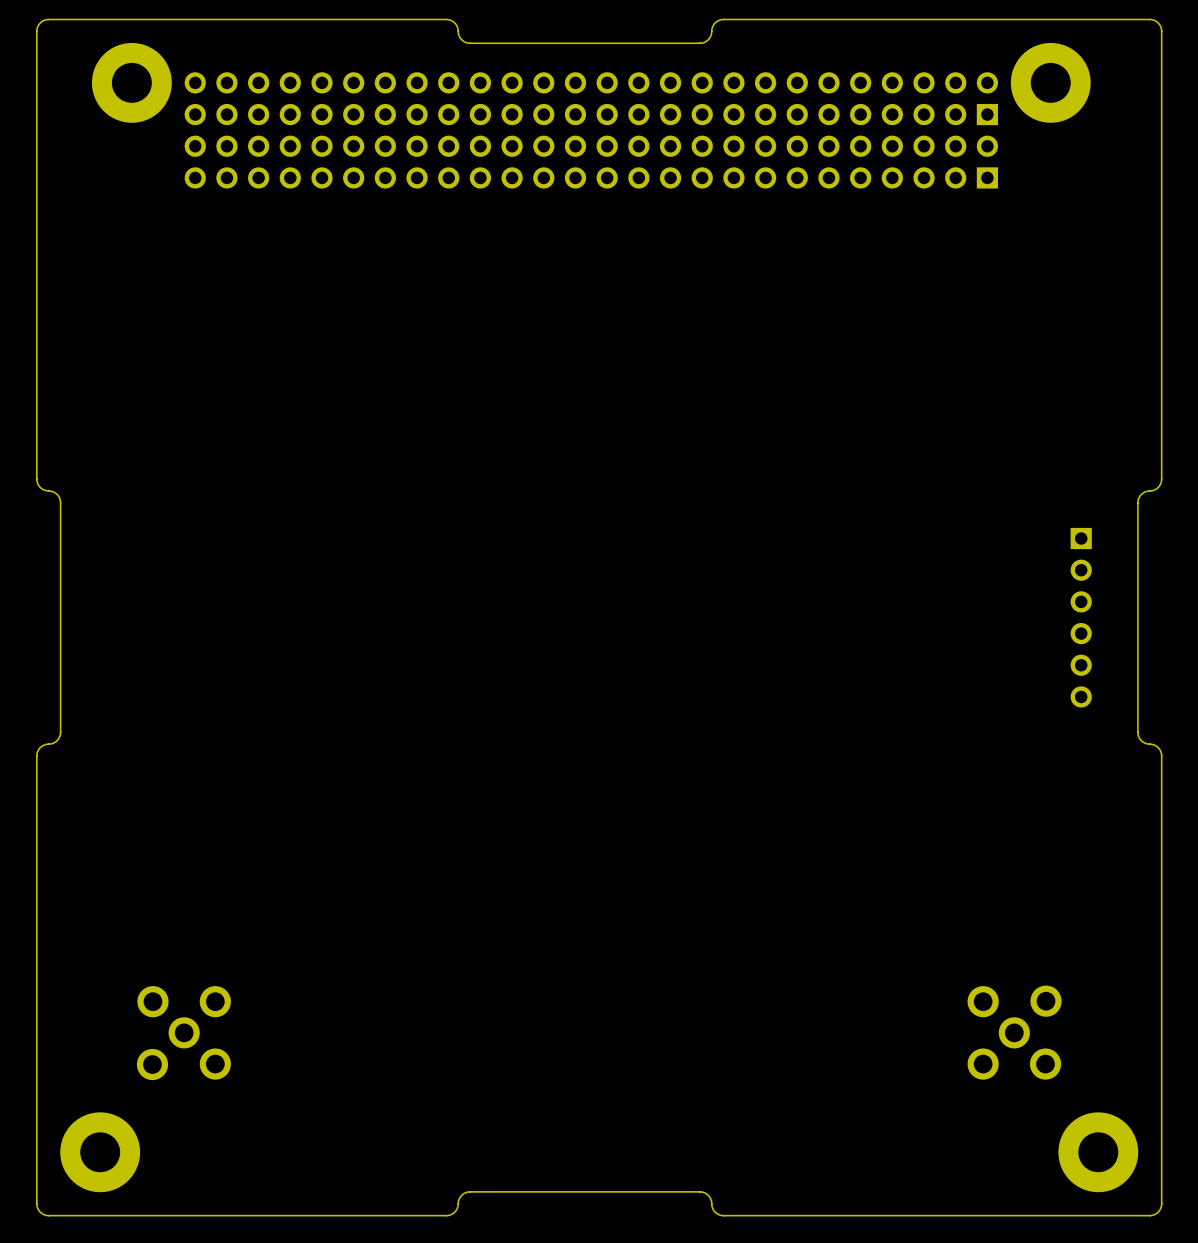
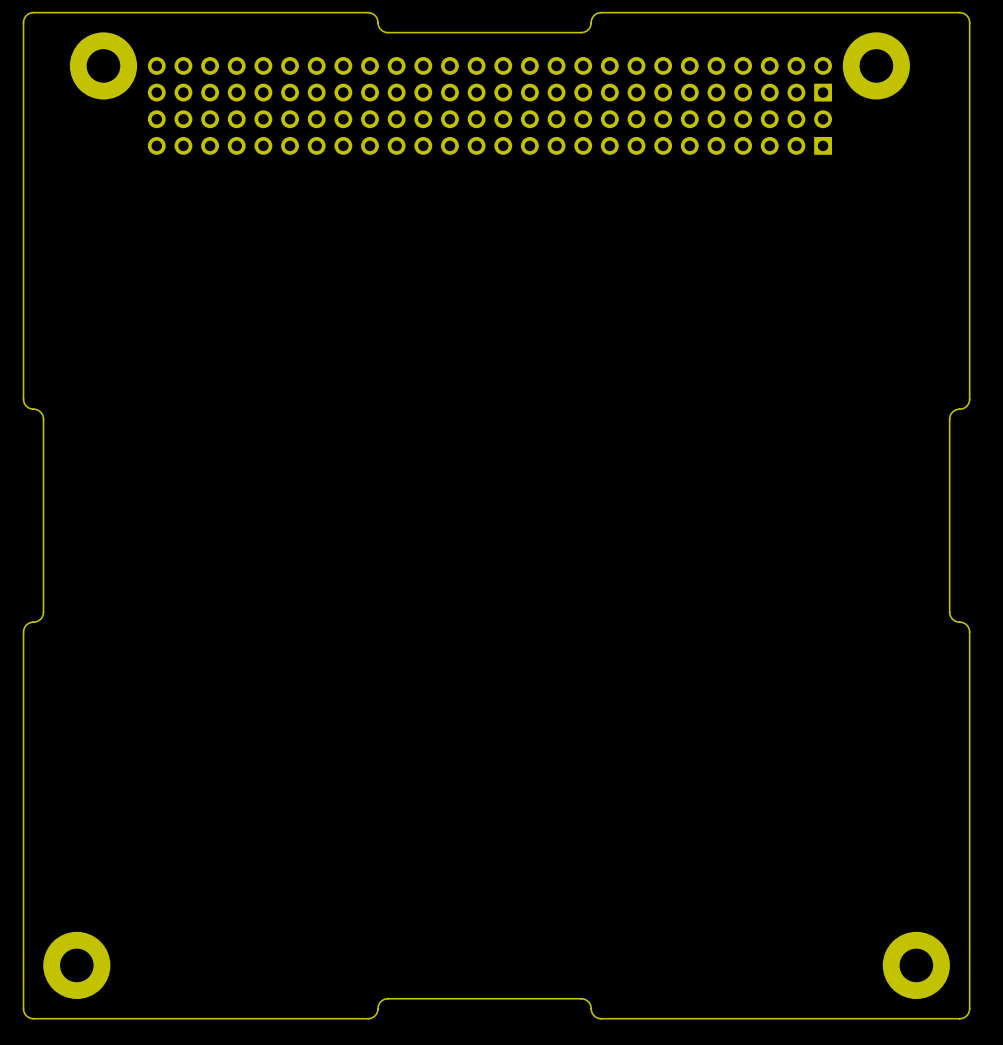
part: (1081, 617) -> none
part: (1014, 1032) -> none
part: (183, 1033) -> none

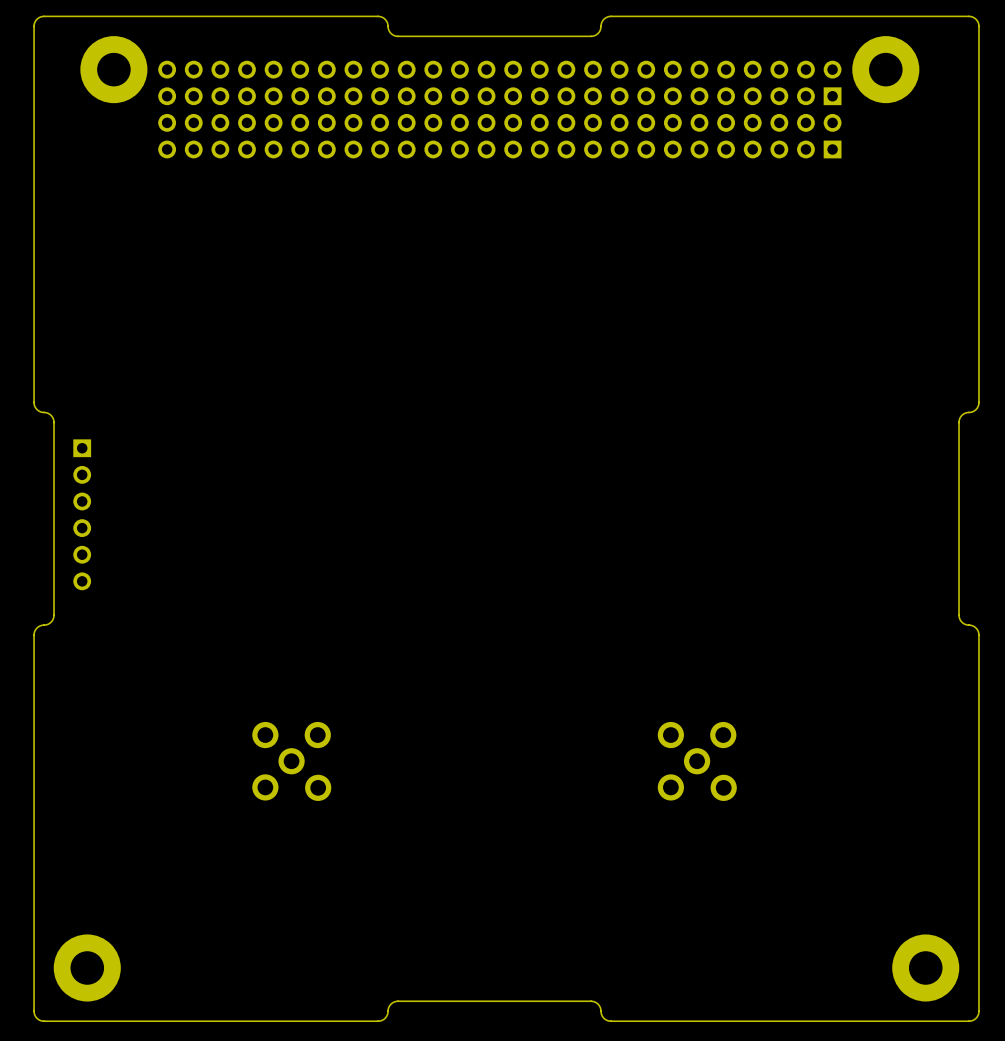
part: none -> (82, 514)
part: none -> (291, 761)
part: none -> (697, 761)

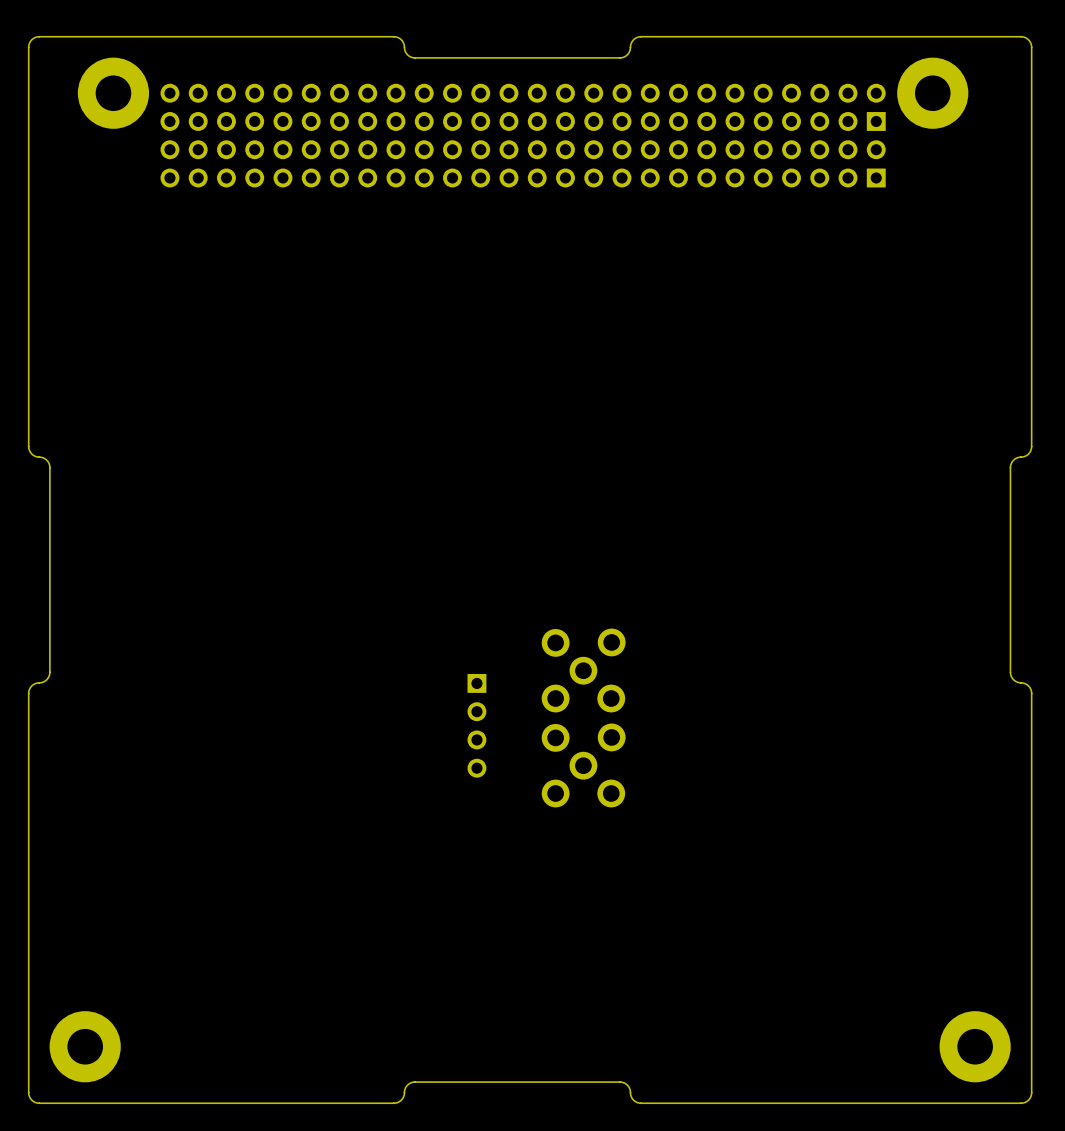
part: (82, 514) -> none
part: none -> (583, 670)
part: none -> (476, 725)
part: none -> (583, 765)
part: (291, 761) -> none
part: (697, 761) -> none

